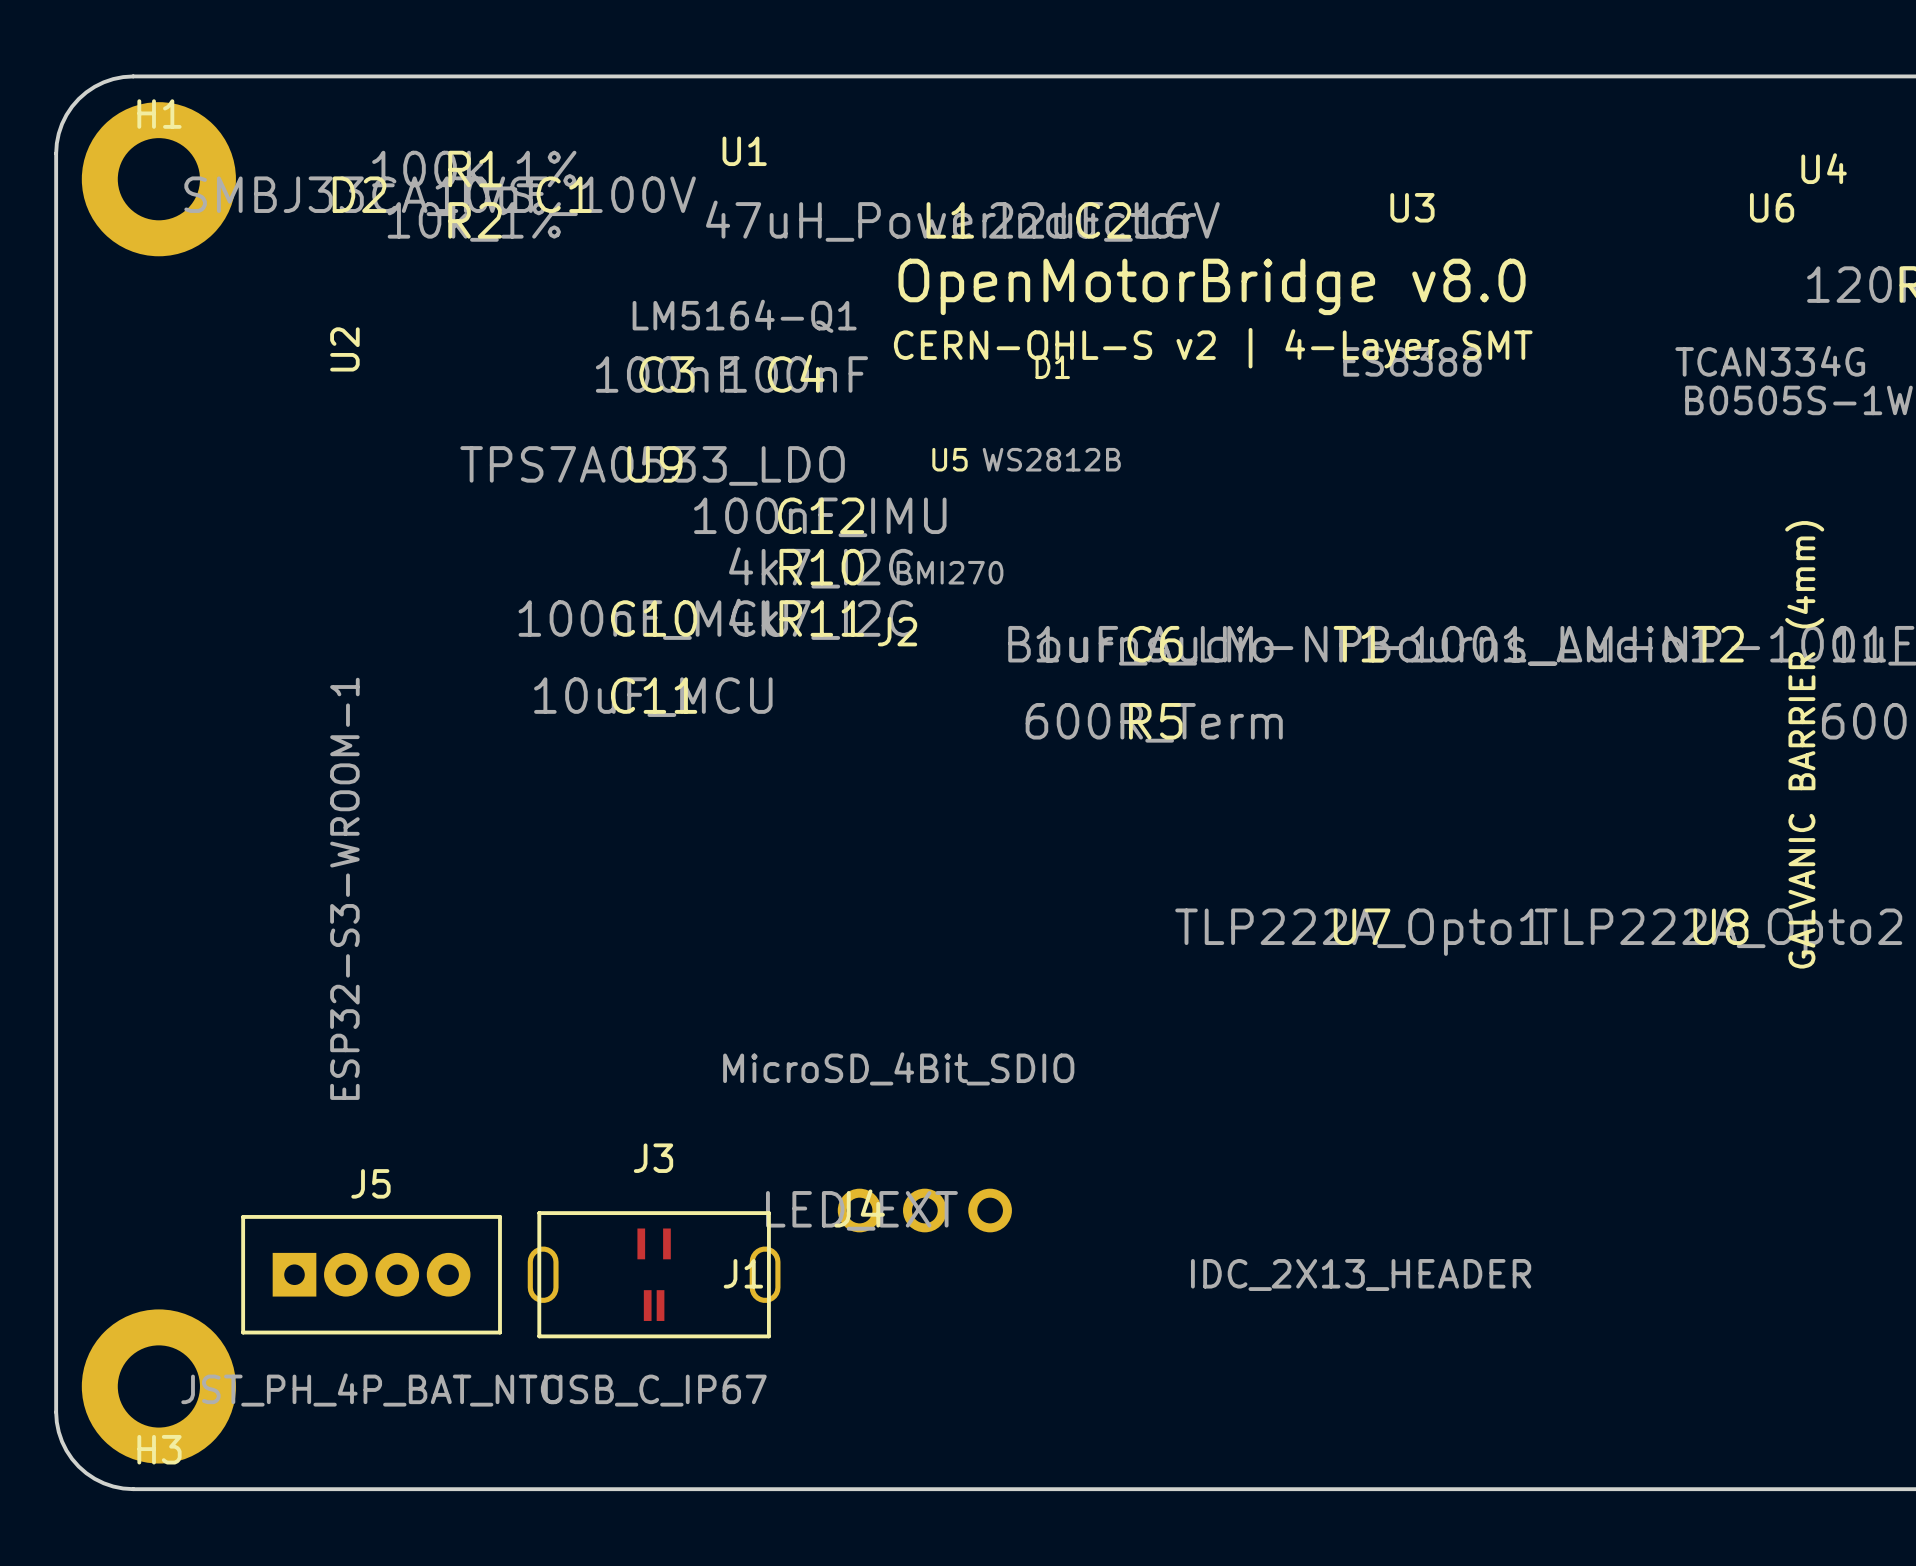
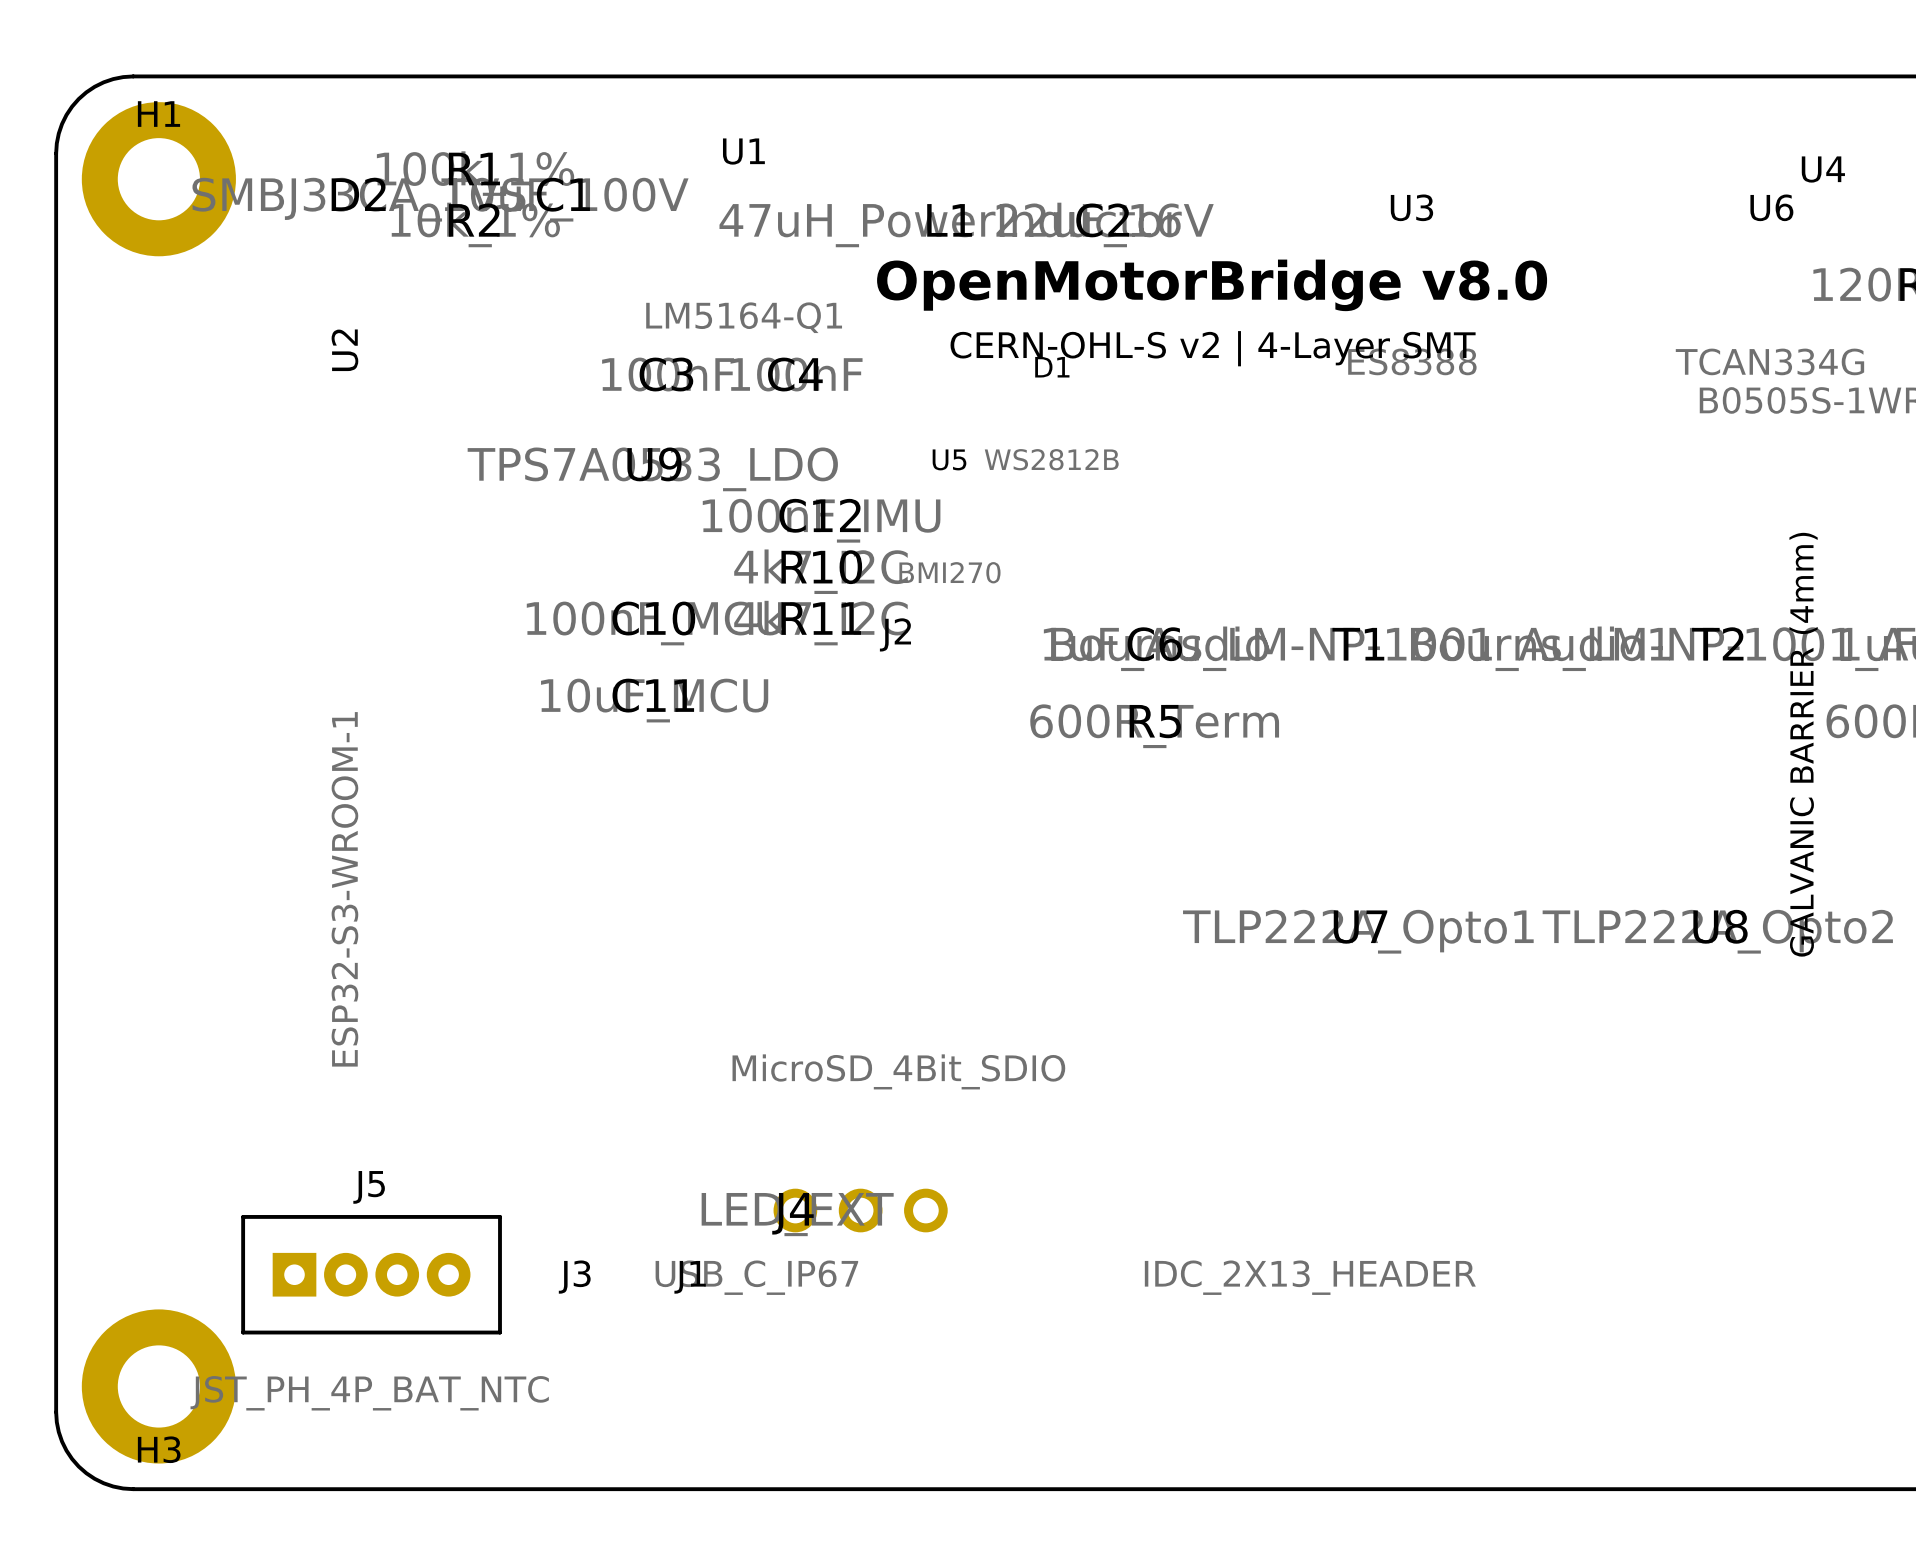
J3 name position: J3 (653, 1158) -> J3 (574, 1277)
J4 position: (924, 1210) -> (860, 1210)
J3 footprint: [527, 1211, 781, 1339] -> [558, 1260, 859, 1295]
J1 position: (1127, 1274) -> (1075, 1277)
J3 value position: USB_C_IP67 (655, 1390) -> USB_C_IP67 (756, 1277)

